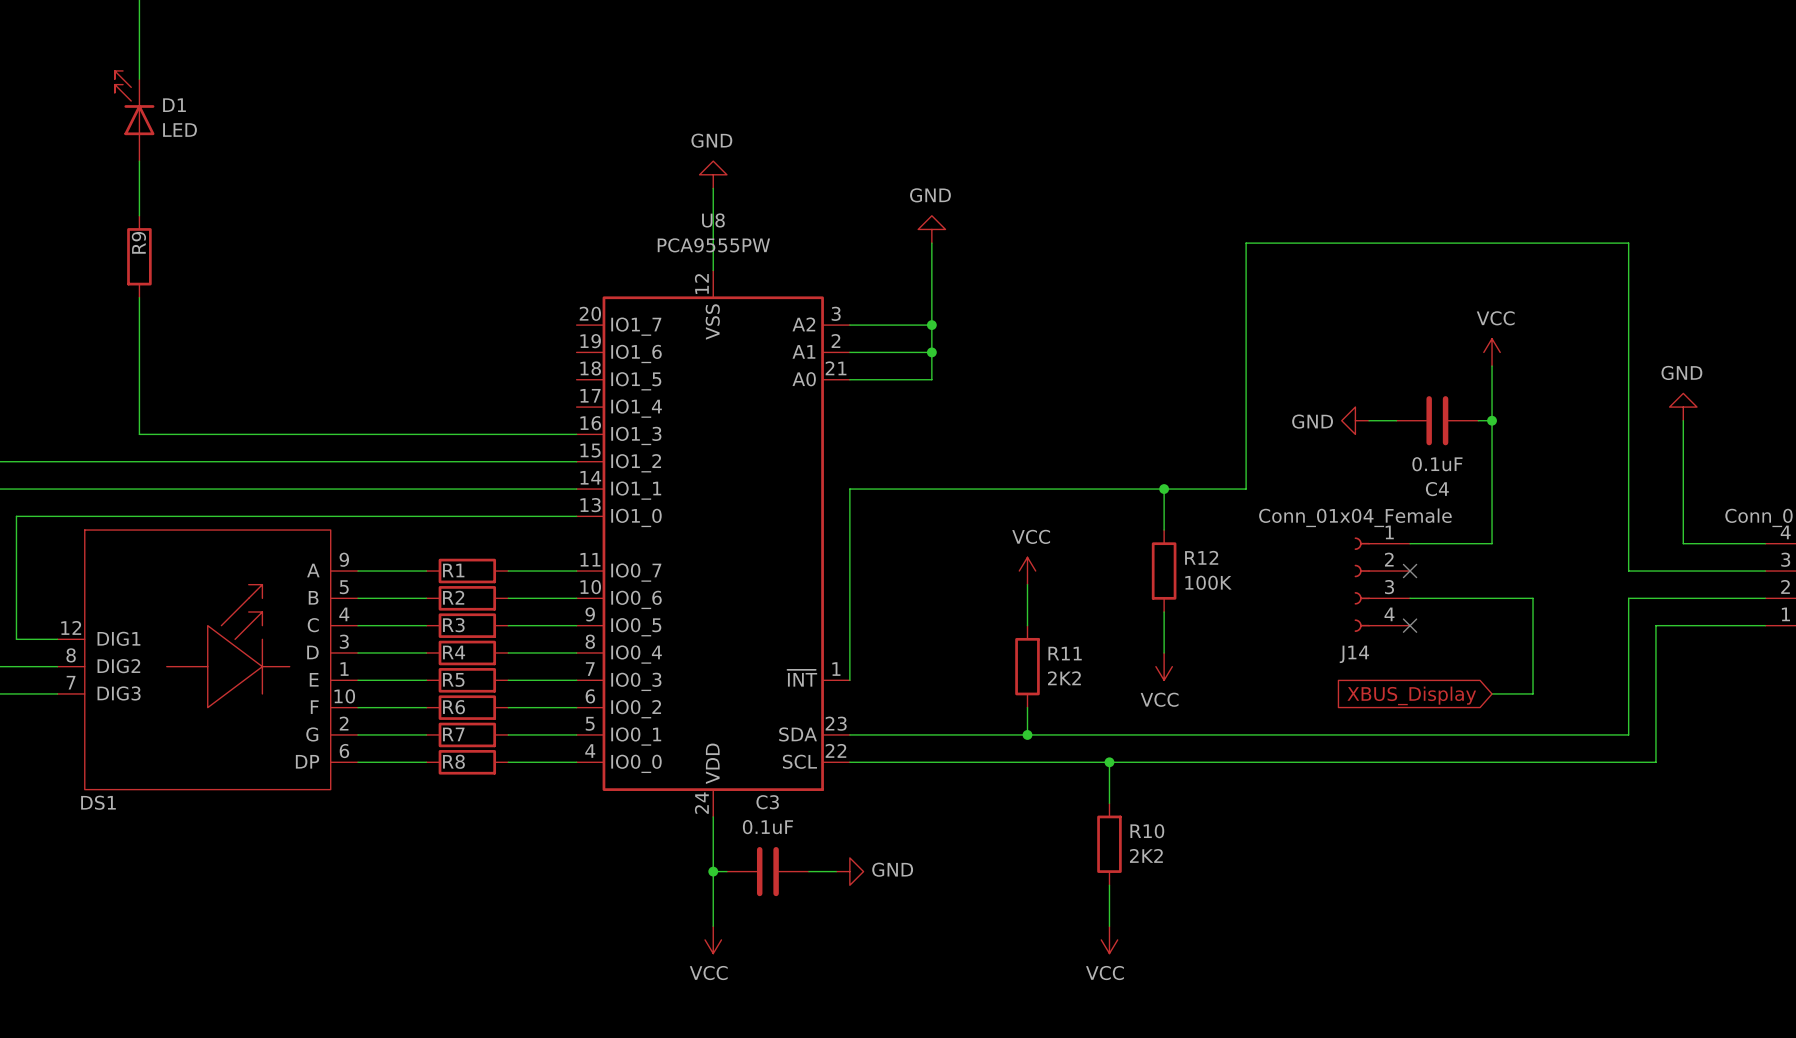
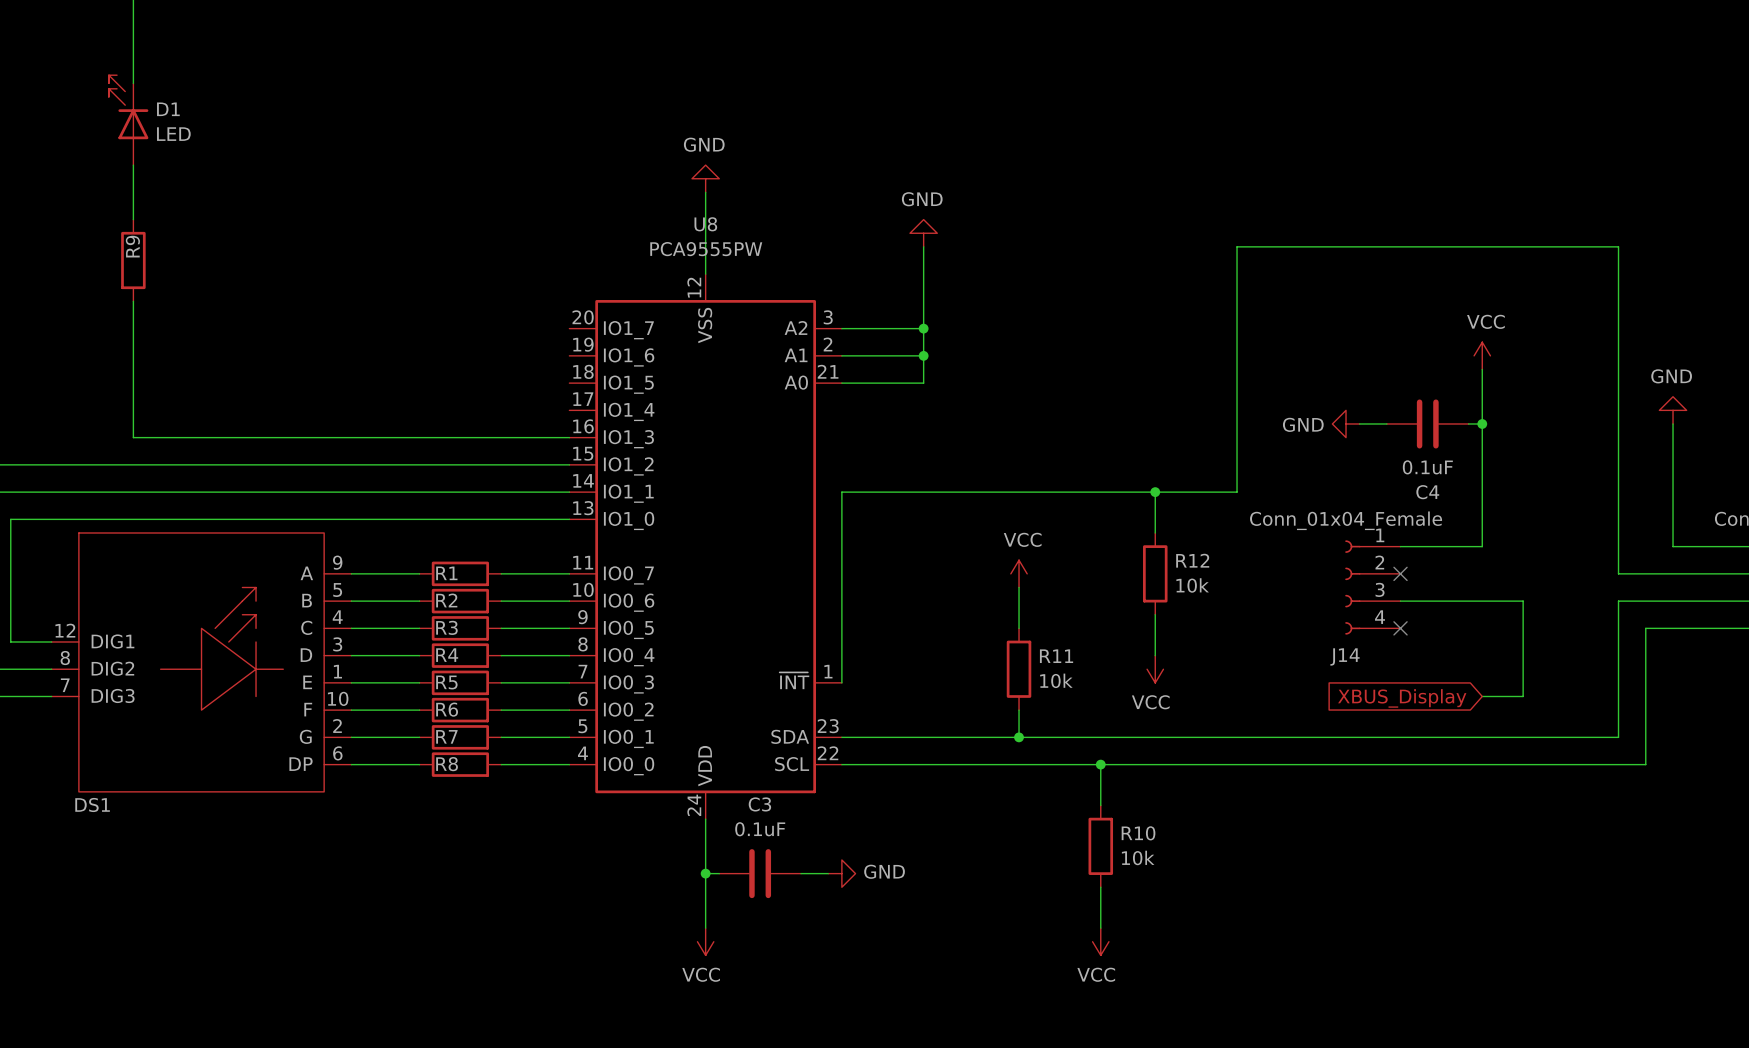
R12 value: 100K (1208, 582) -> 10k (1192, 585)
R11 value: 2K2 (1064, 678) -> 10k (1056, 680)
R10 value: 2K2 (1146, 855) -> 10k (1138, 857)

